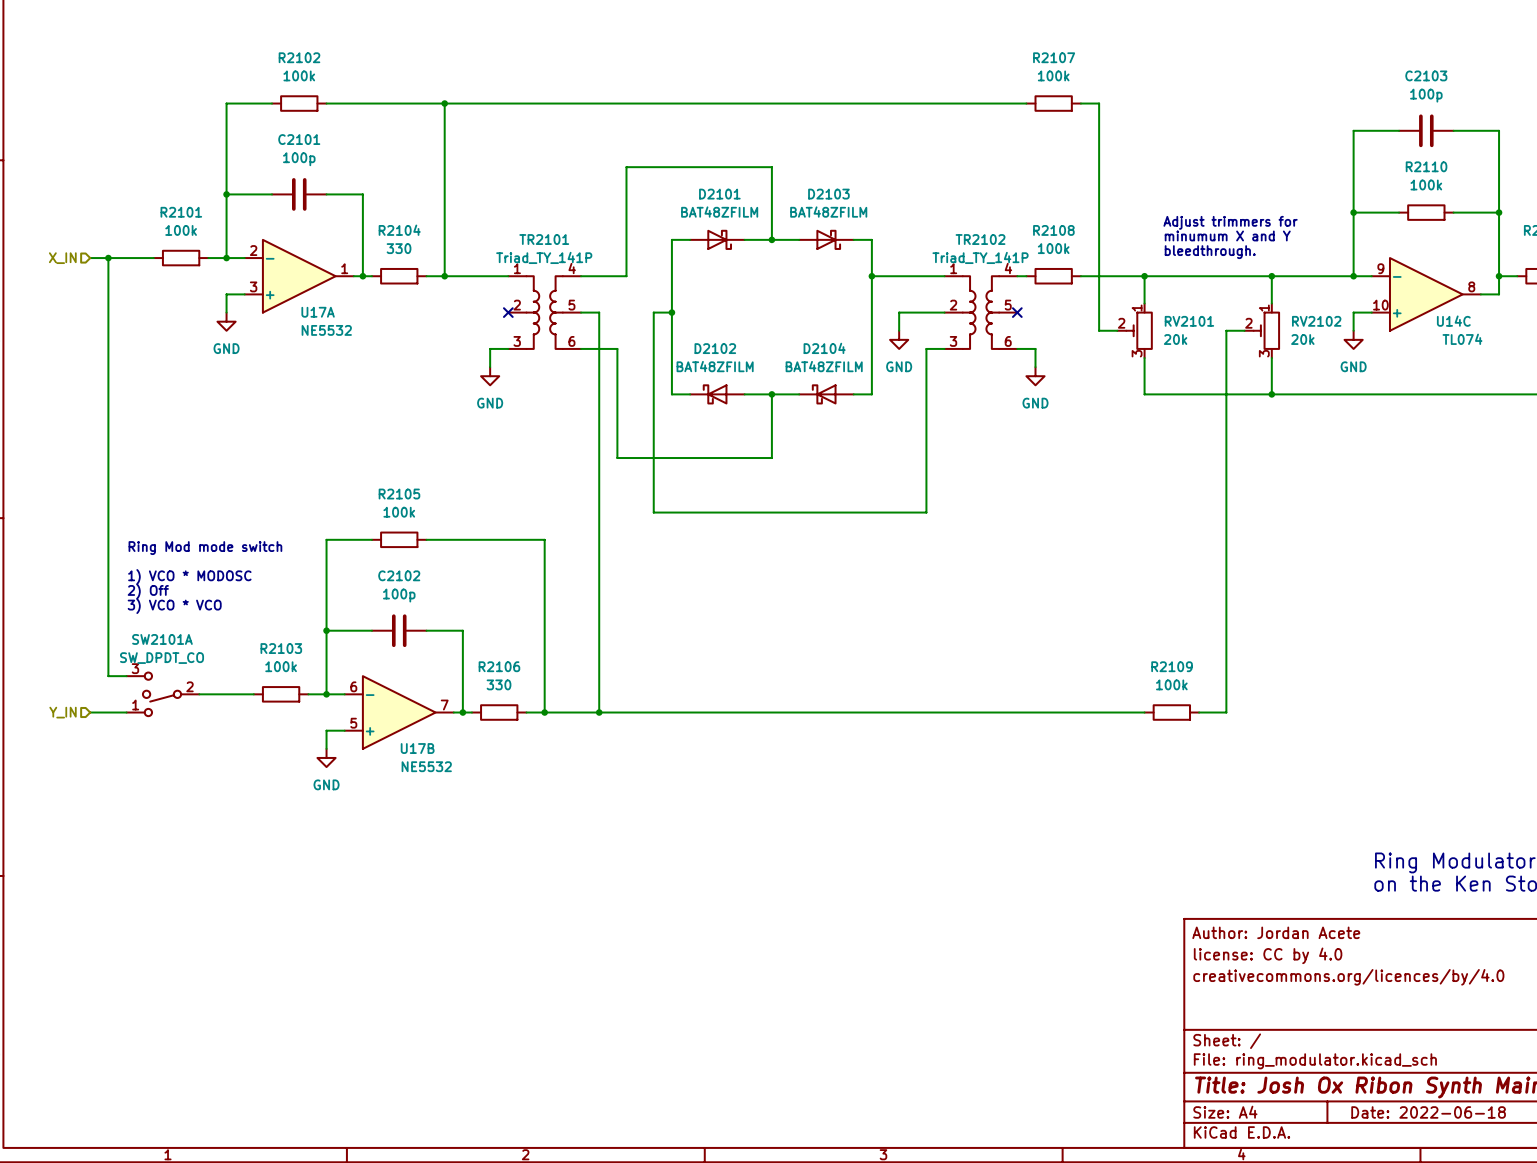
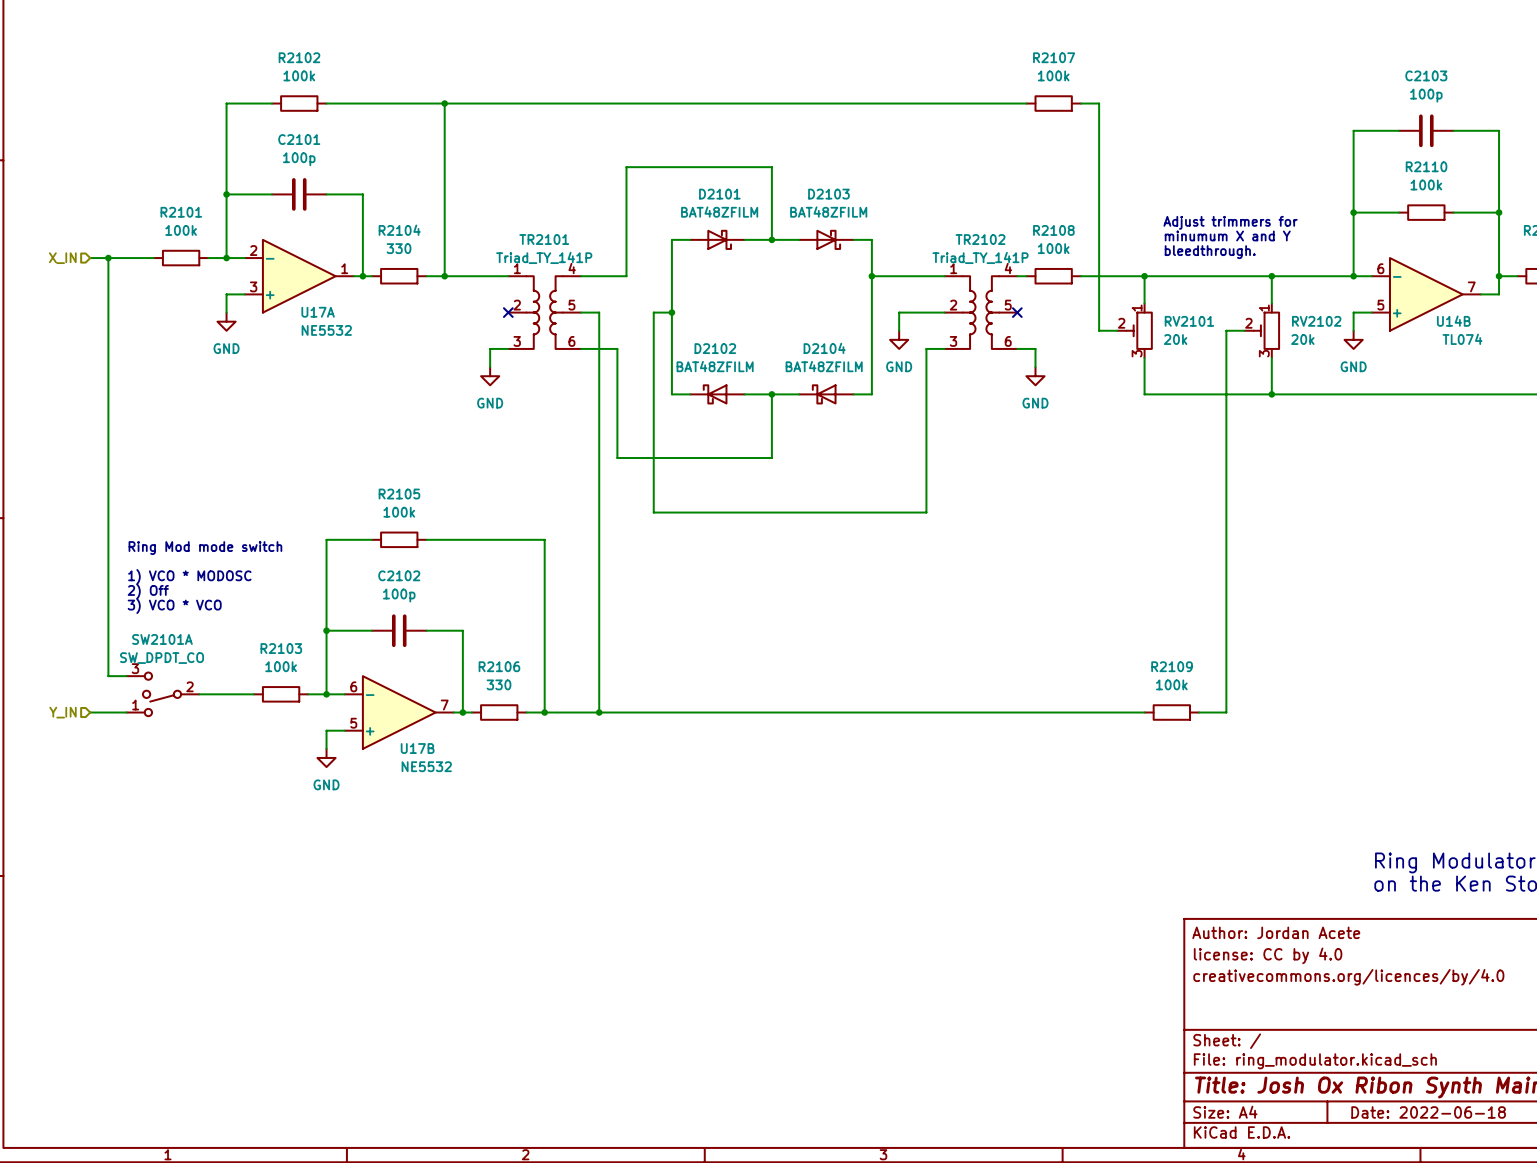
U14C pin number: 9 (1380, 268) -> 6 (1380, 268)
U14C pin number: 8 (1471, 286) -> 7 (1471, 286)
U14C pin number: 10 (1380, 305) -> 5 (1380, 305)
U14C name: U14C (1453, 321) -> U14B (1453, 321)

